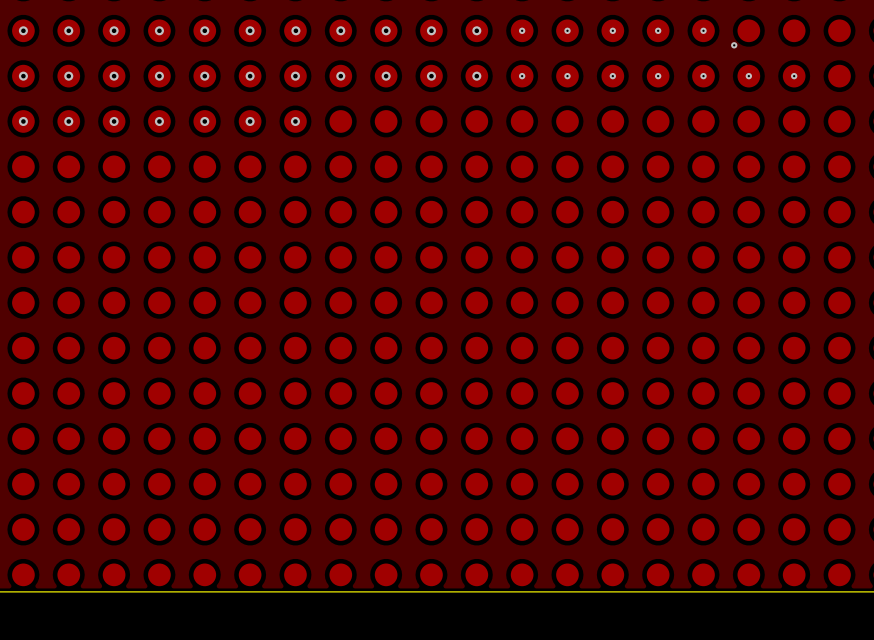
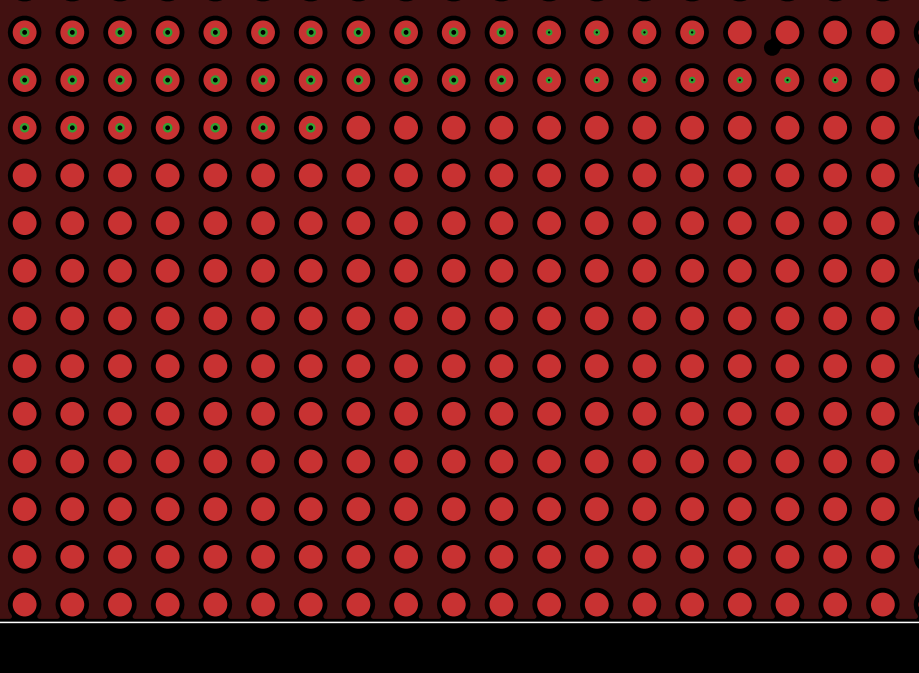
via: (703, 30) -> none
via: (734, 45) -> none

